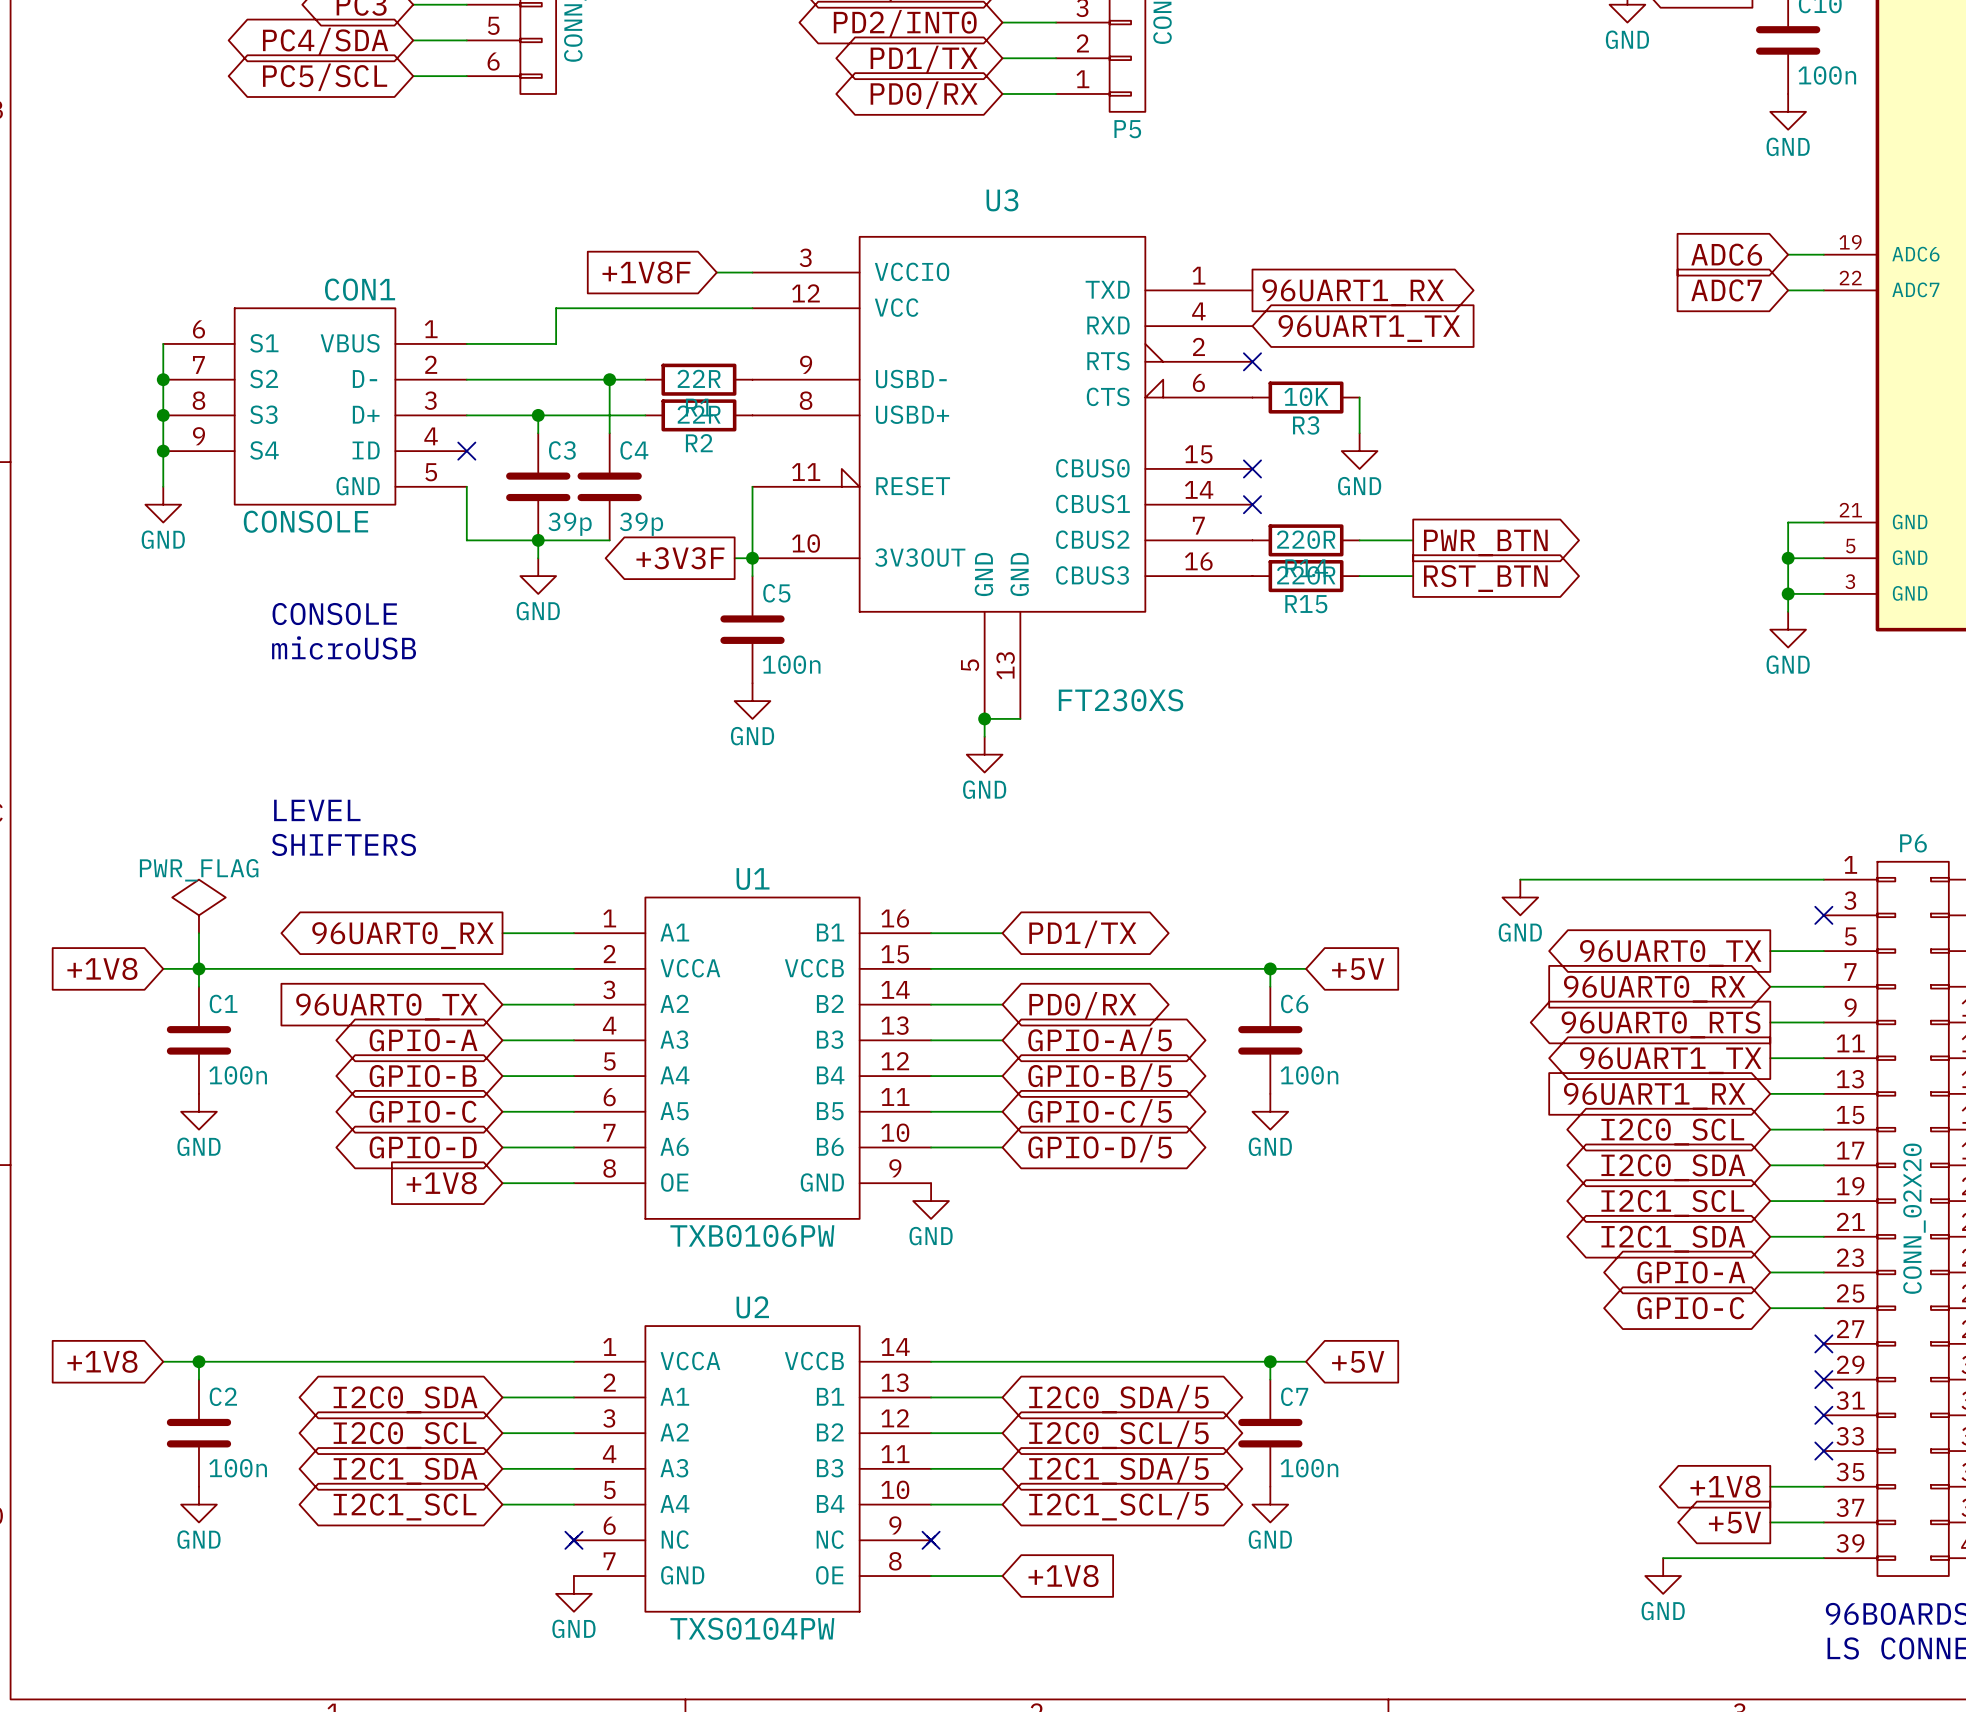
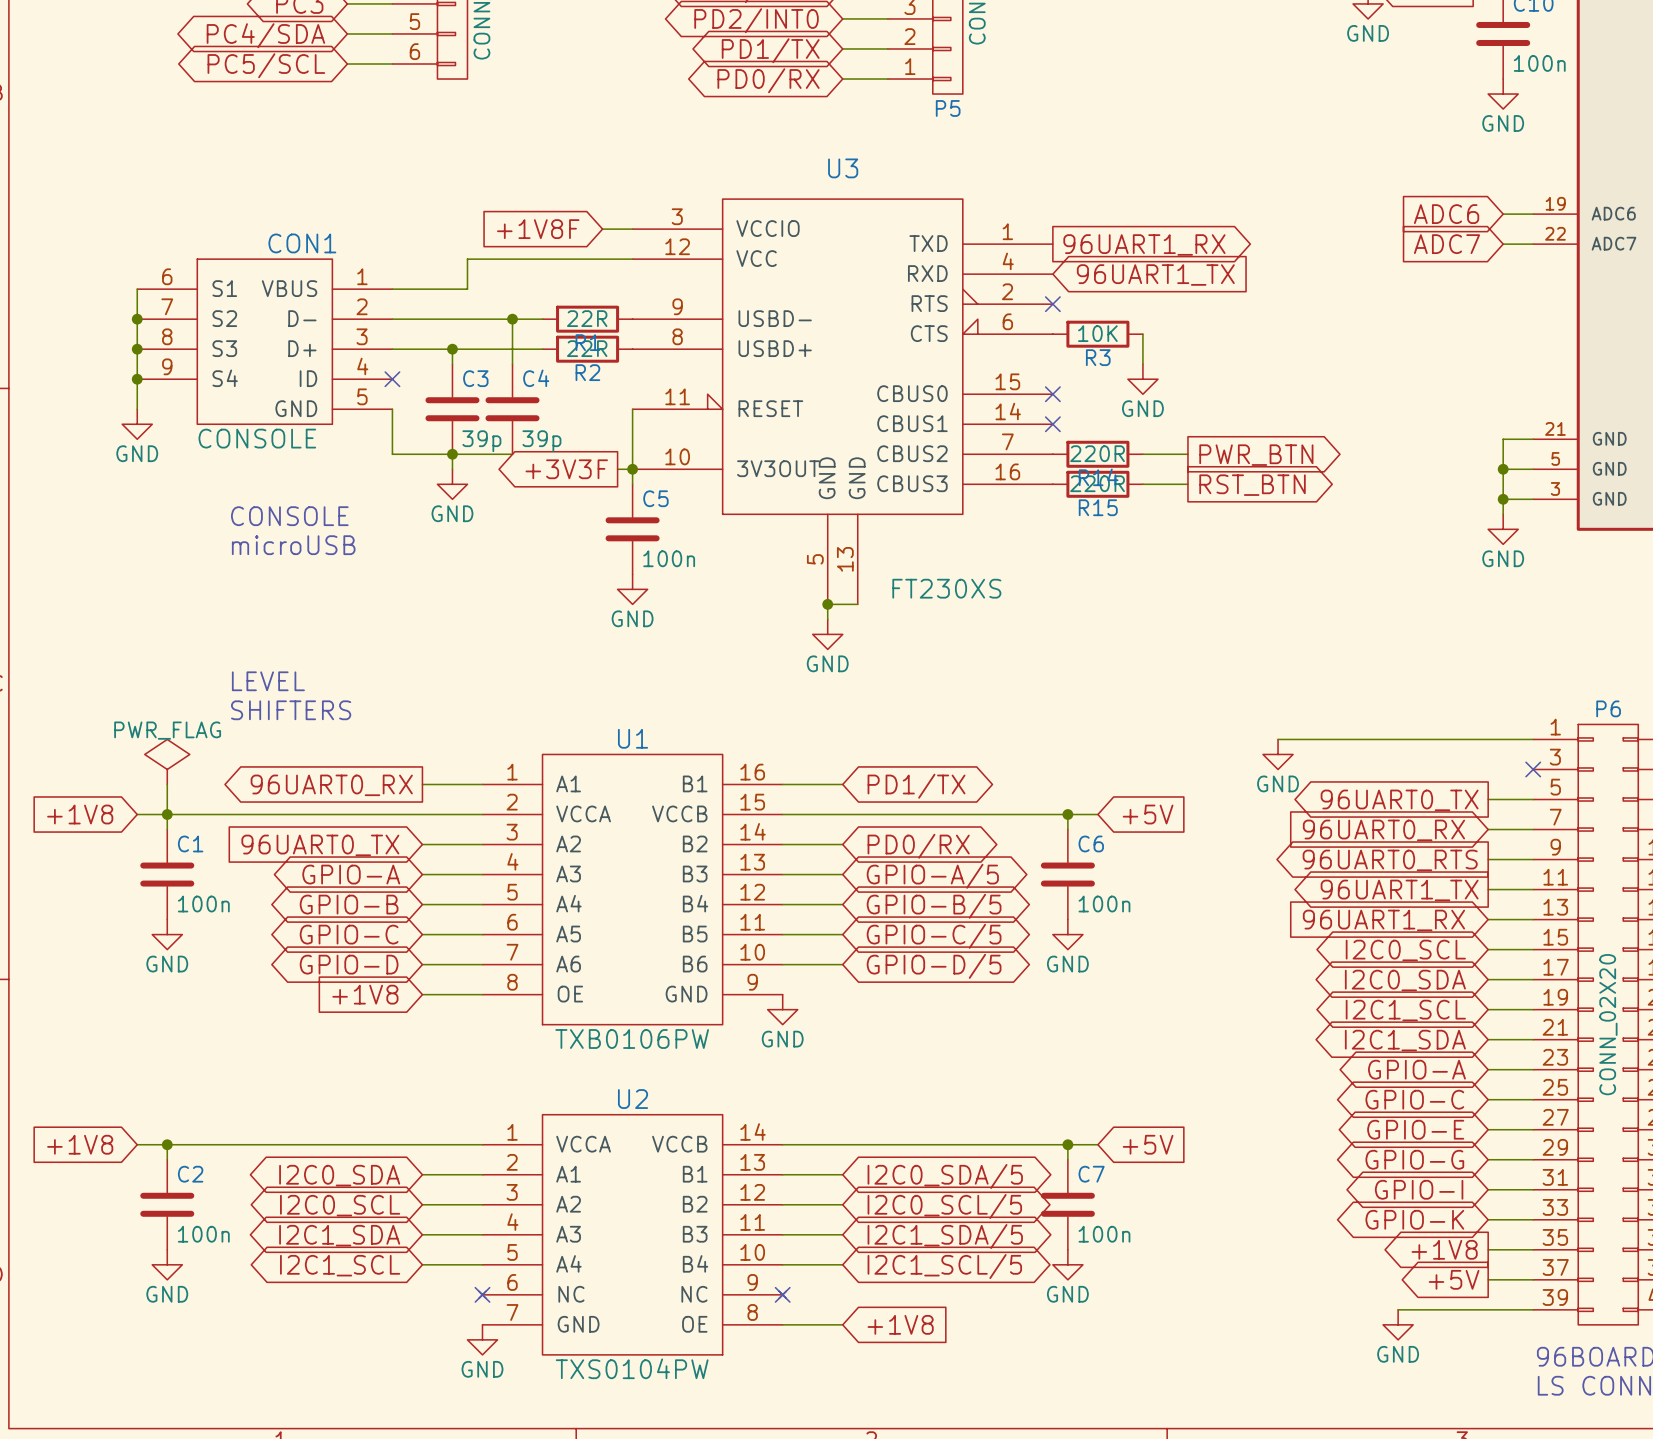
global label: none -> GPIO-E (1415, 1129)
wire: none -> (1488, 1129) (1533, 1129)
no-connect mark: (1823, 1343) -> none
global label: none -> GPIO-G (1414, 1159)
wire: none -> (1488, 1159) (1533, 1159)
no-connect mark: (1823, 1379) -> none
global label: none -> GPIO-I (1419, 1189)
wire: none -> (1488, 1189) (1533, 1189)
no-connect mark: (1823, 1415) -> none
global label: none -> GPIO-K (1414, 1219)
wire: none -> (1488, 1219) (1533, 1219)
no-connect mark: (1823, 1451) -> none

